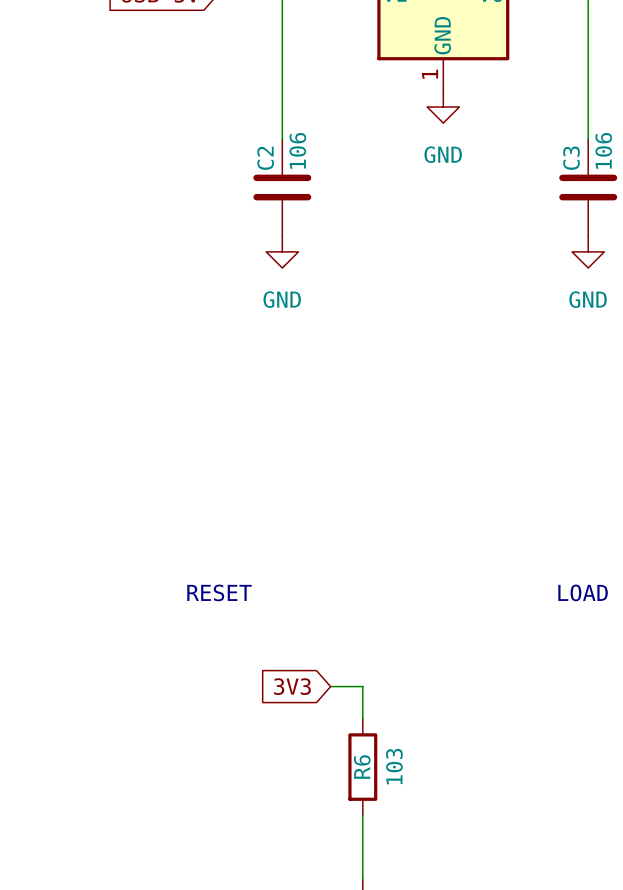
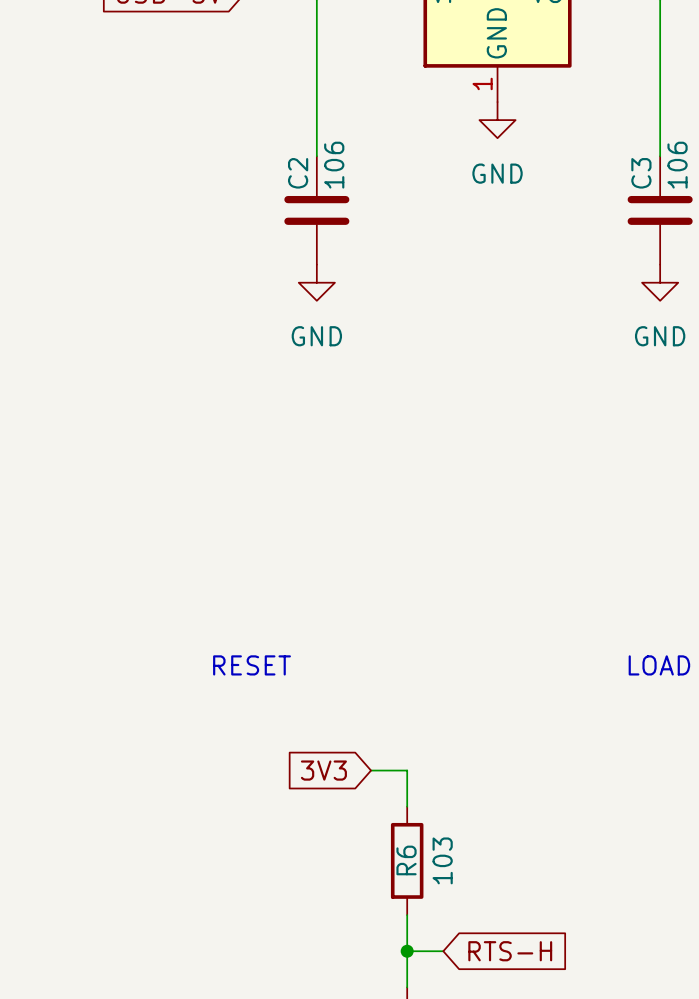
wire: none -> (407, 951) (443, 951)
junction: none -> (407, 951)
global label: none -> RTS-H (510, 951)

